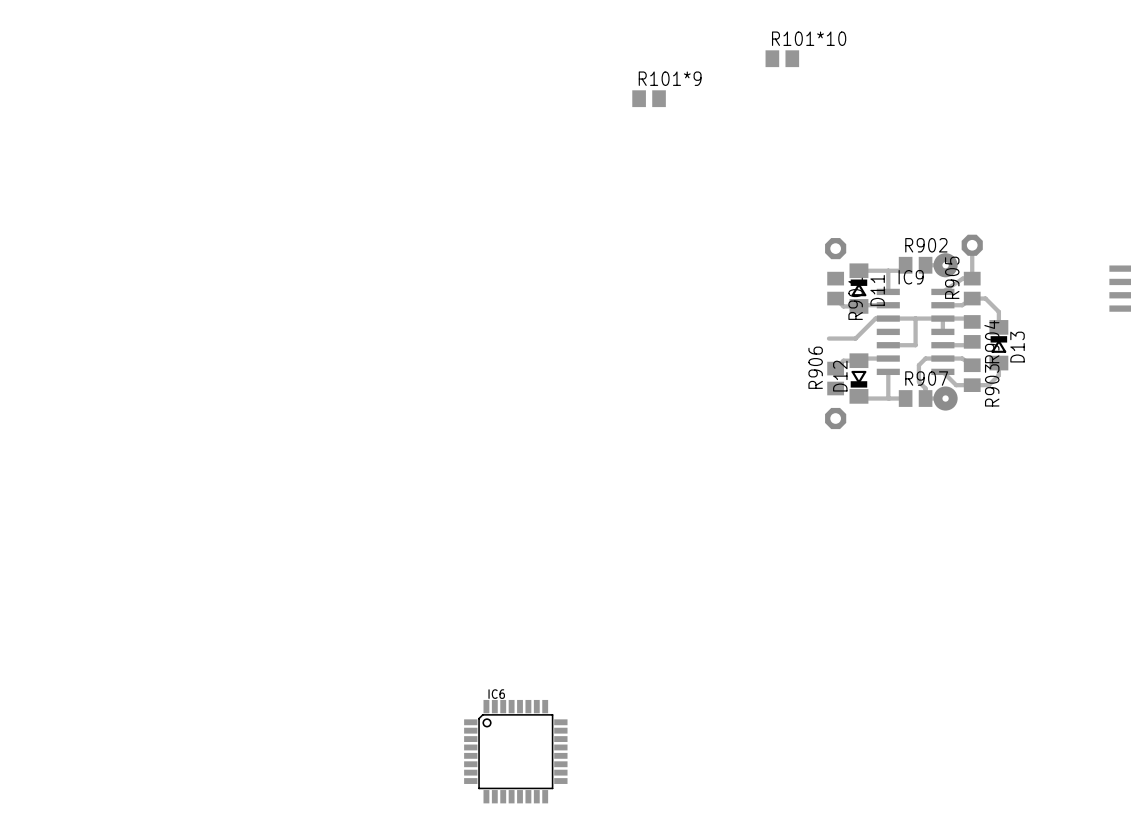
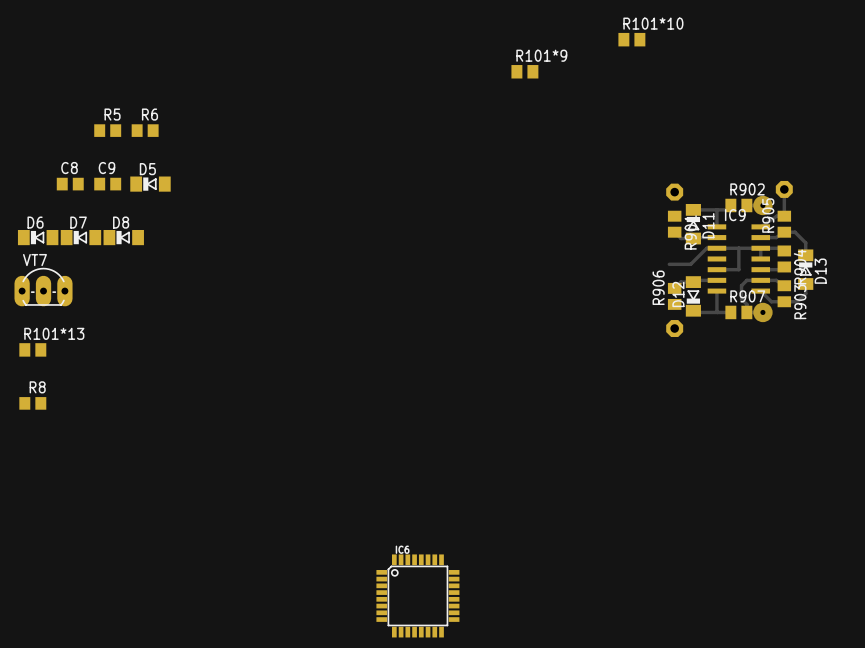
R5: none -> (107, 130)
R6: none -> (145, 130)
C8: none -> (70, 184)
C9: none -> (107, 184)
D5: none -> (150, 184)
D6: none -> (38, 237)
D7: none -> (80, 237)
D8: none -> (123, 237)
VT7: none -> (43, 287)
R101*13: none -> (32, 349)
R8: none -> (32, 403)

